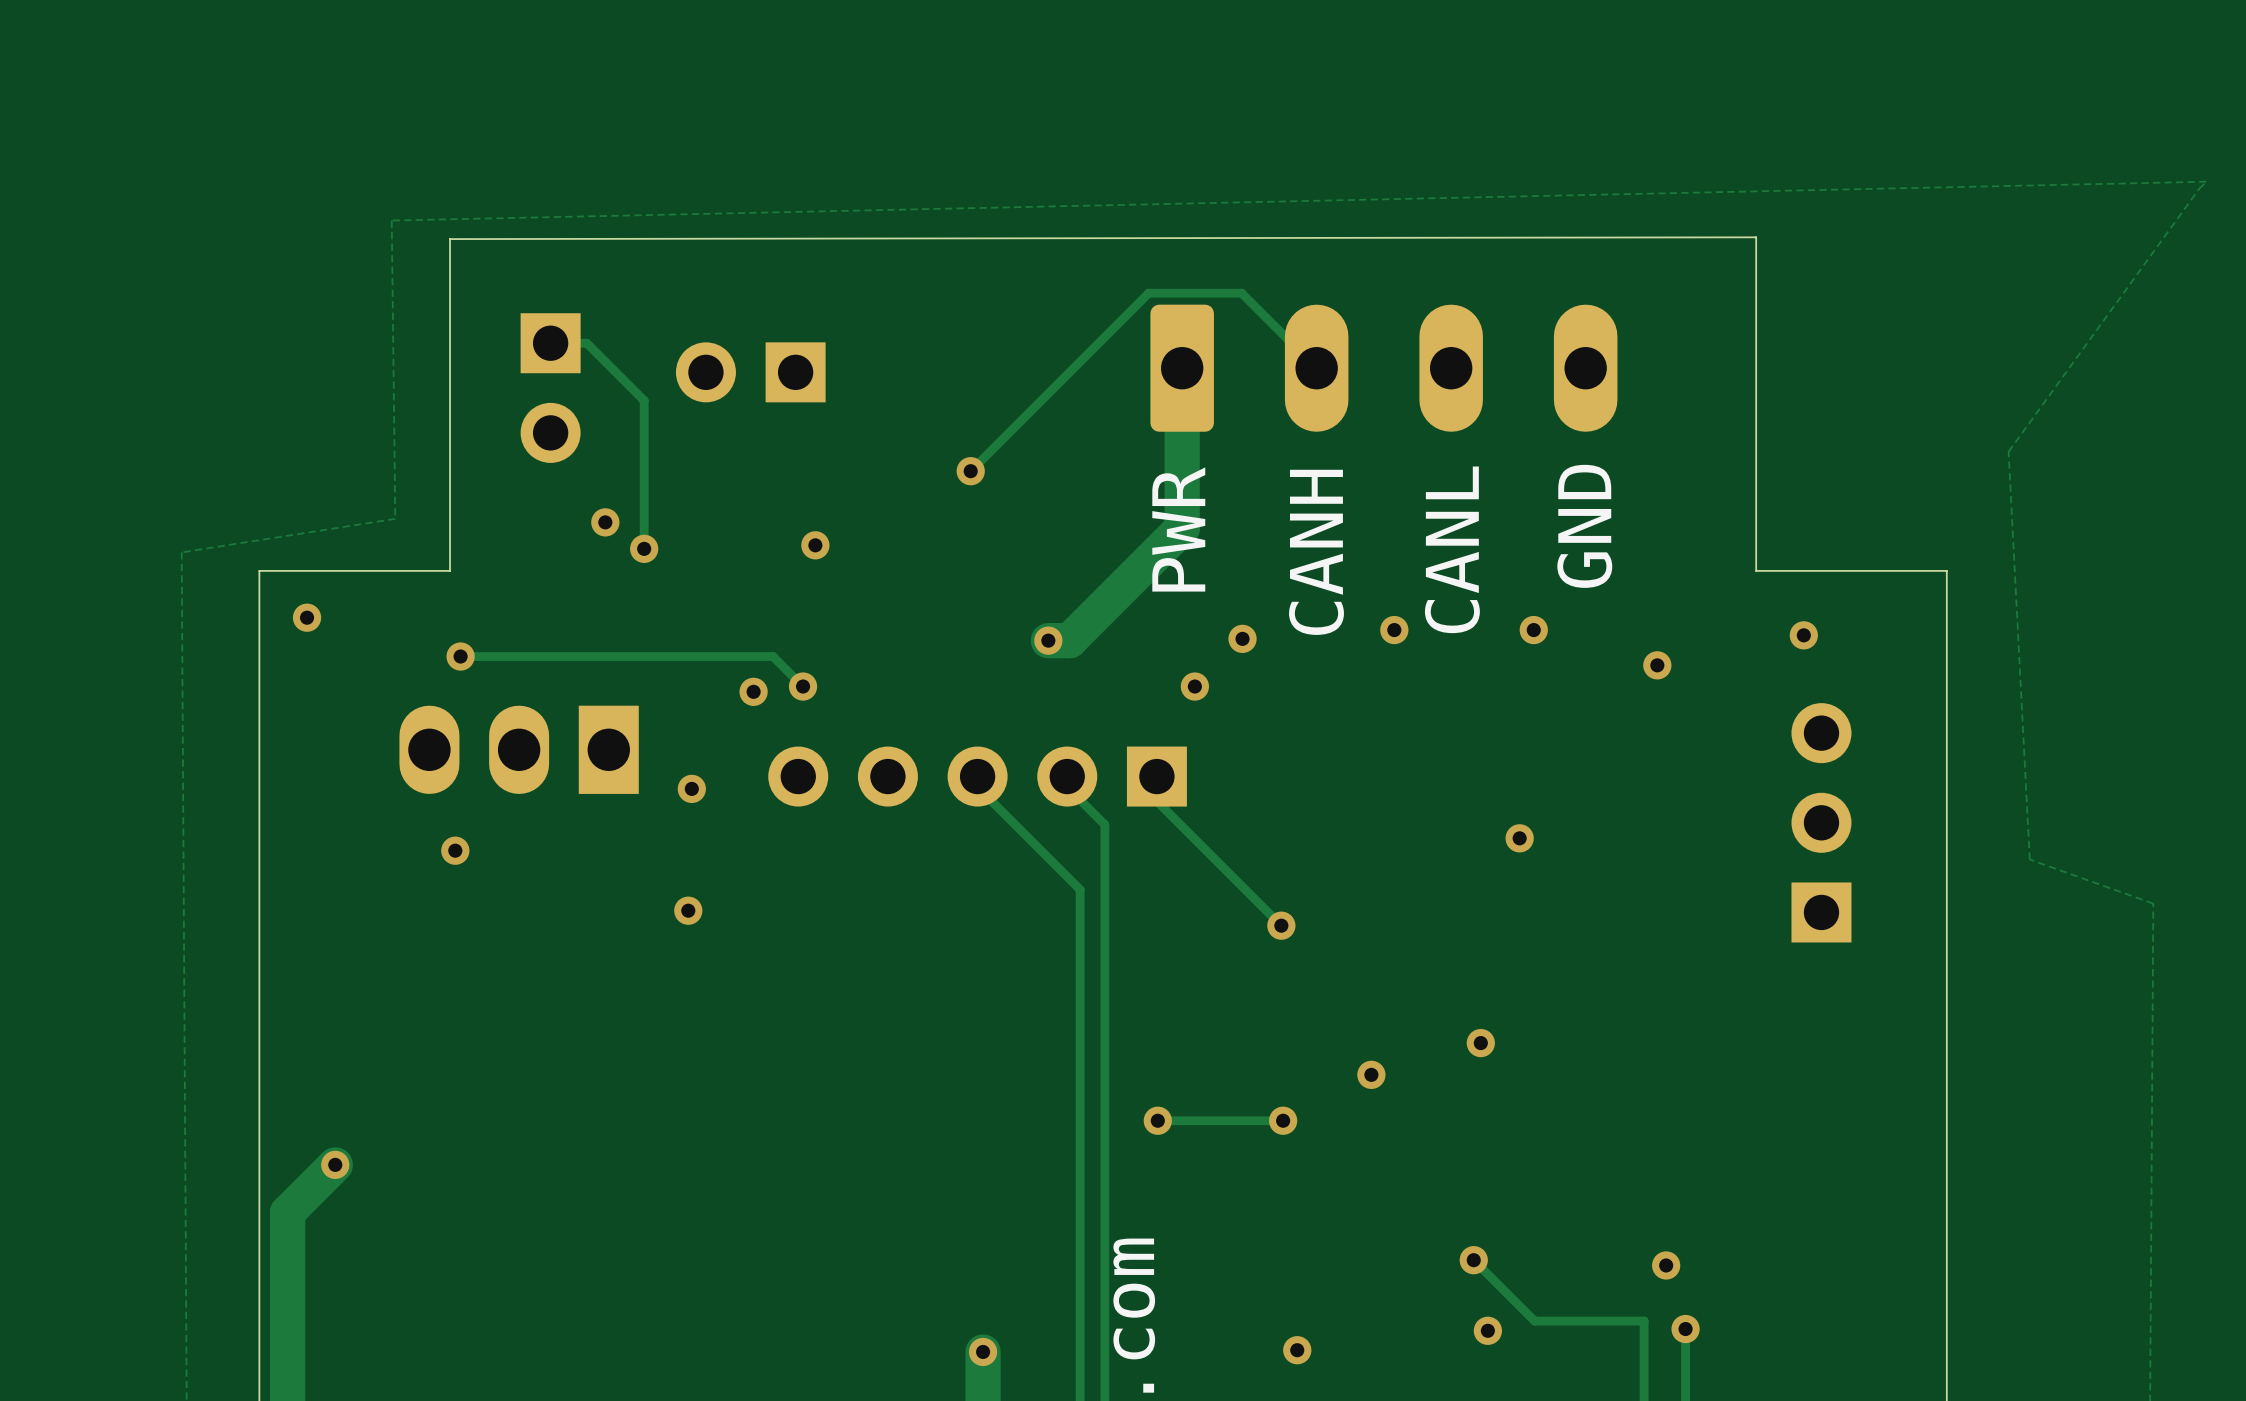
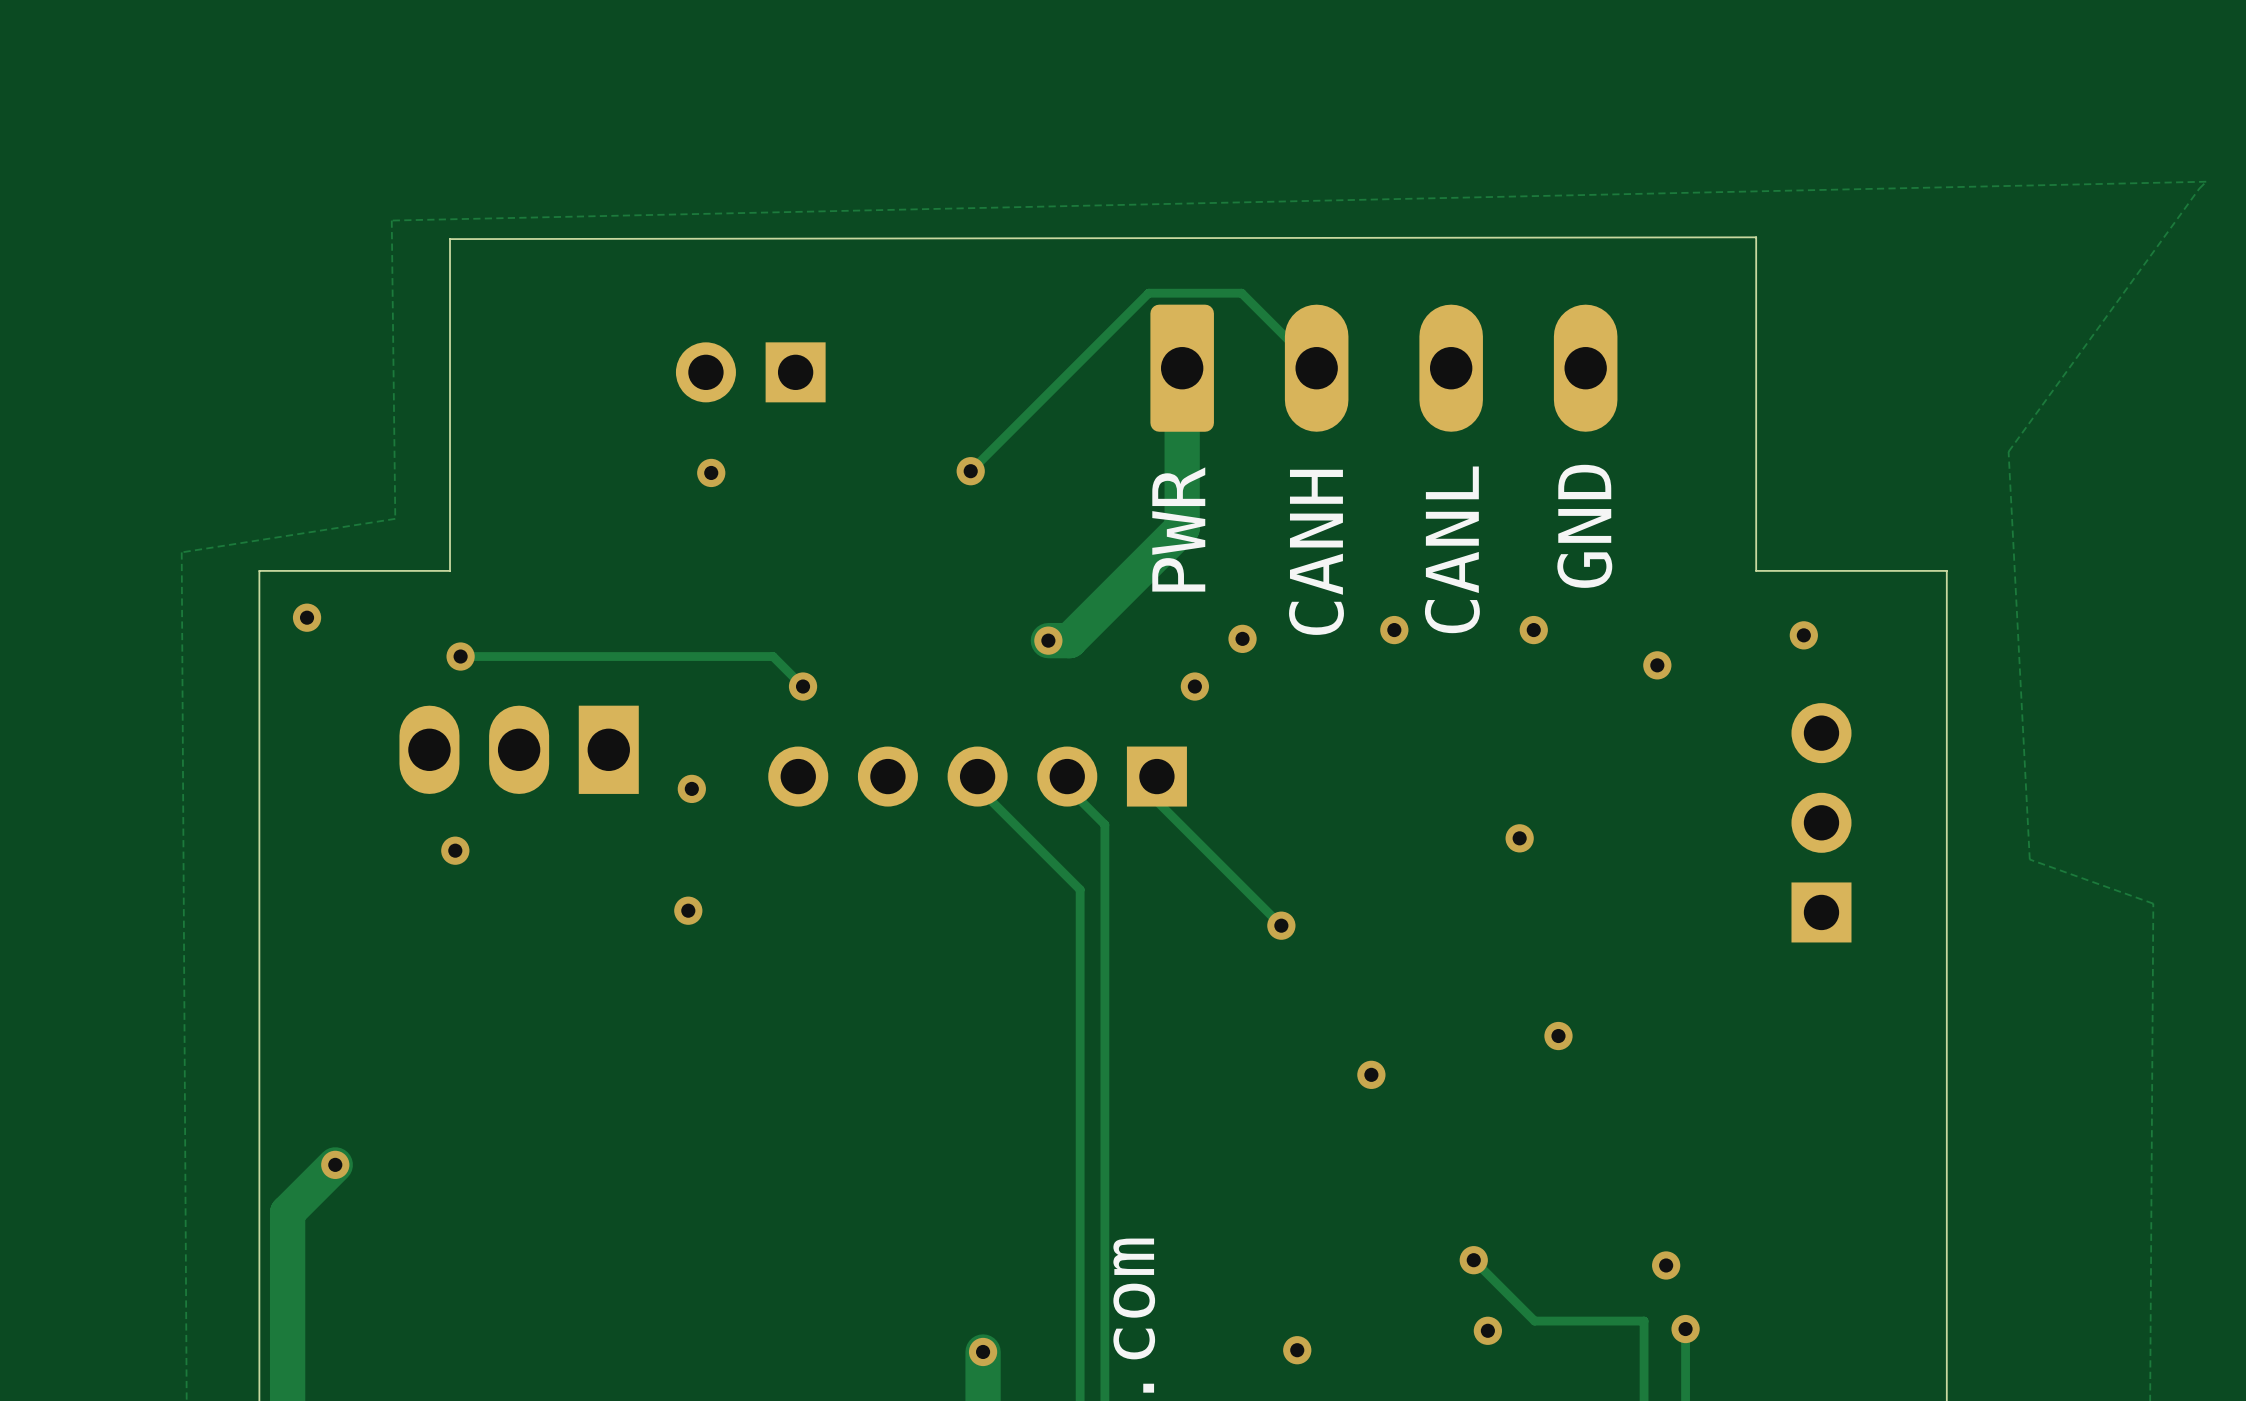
track: (550, 343) (586, 343) (644, 400) (644, 548) -> none
part: (550, 388) -> none
via: none -> (711, 472)
via: (605, 522) -> none
via: (815, 545) -> none
via: (644, 548) -> none
via: (753, 691) -> none
via position: (1480, 1043) -> (1558, 1036)
via: (1157, 1120) -> none
track: (1283, 1120) (1157, 1120) -> none
via: (1283, 1120) -> none

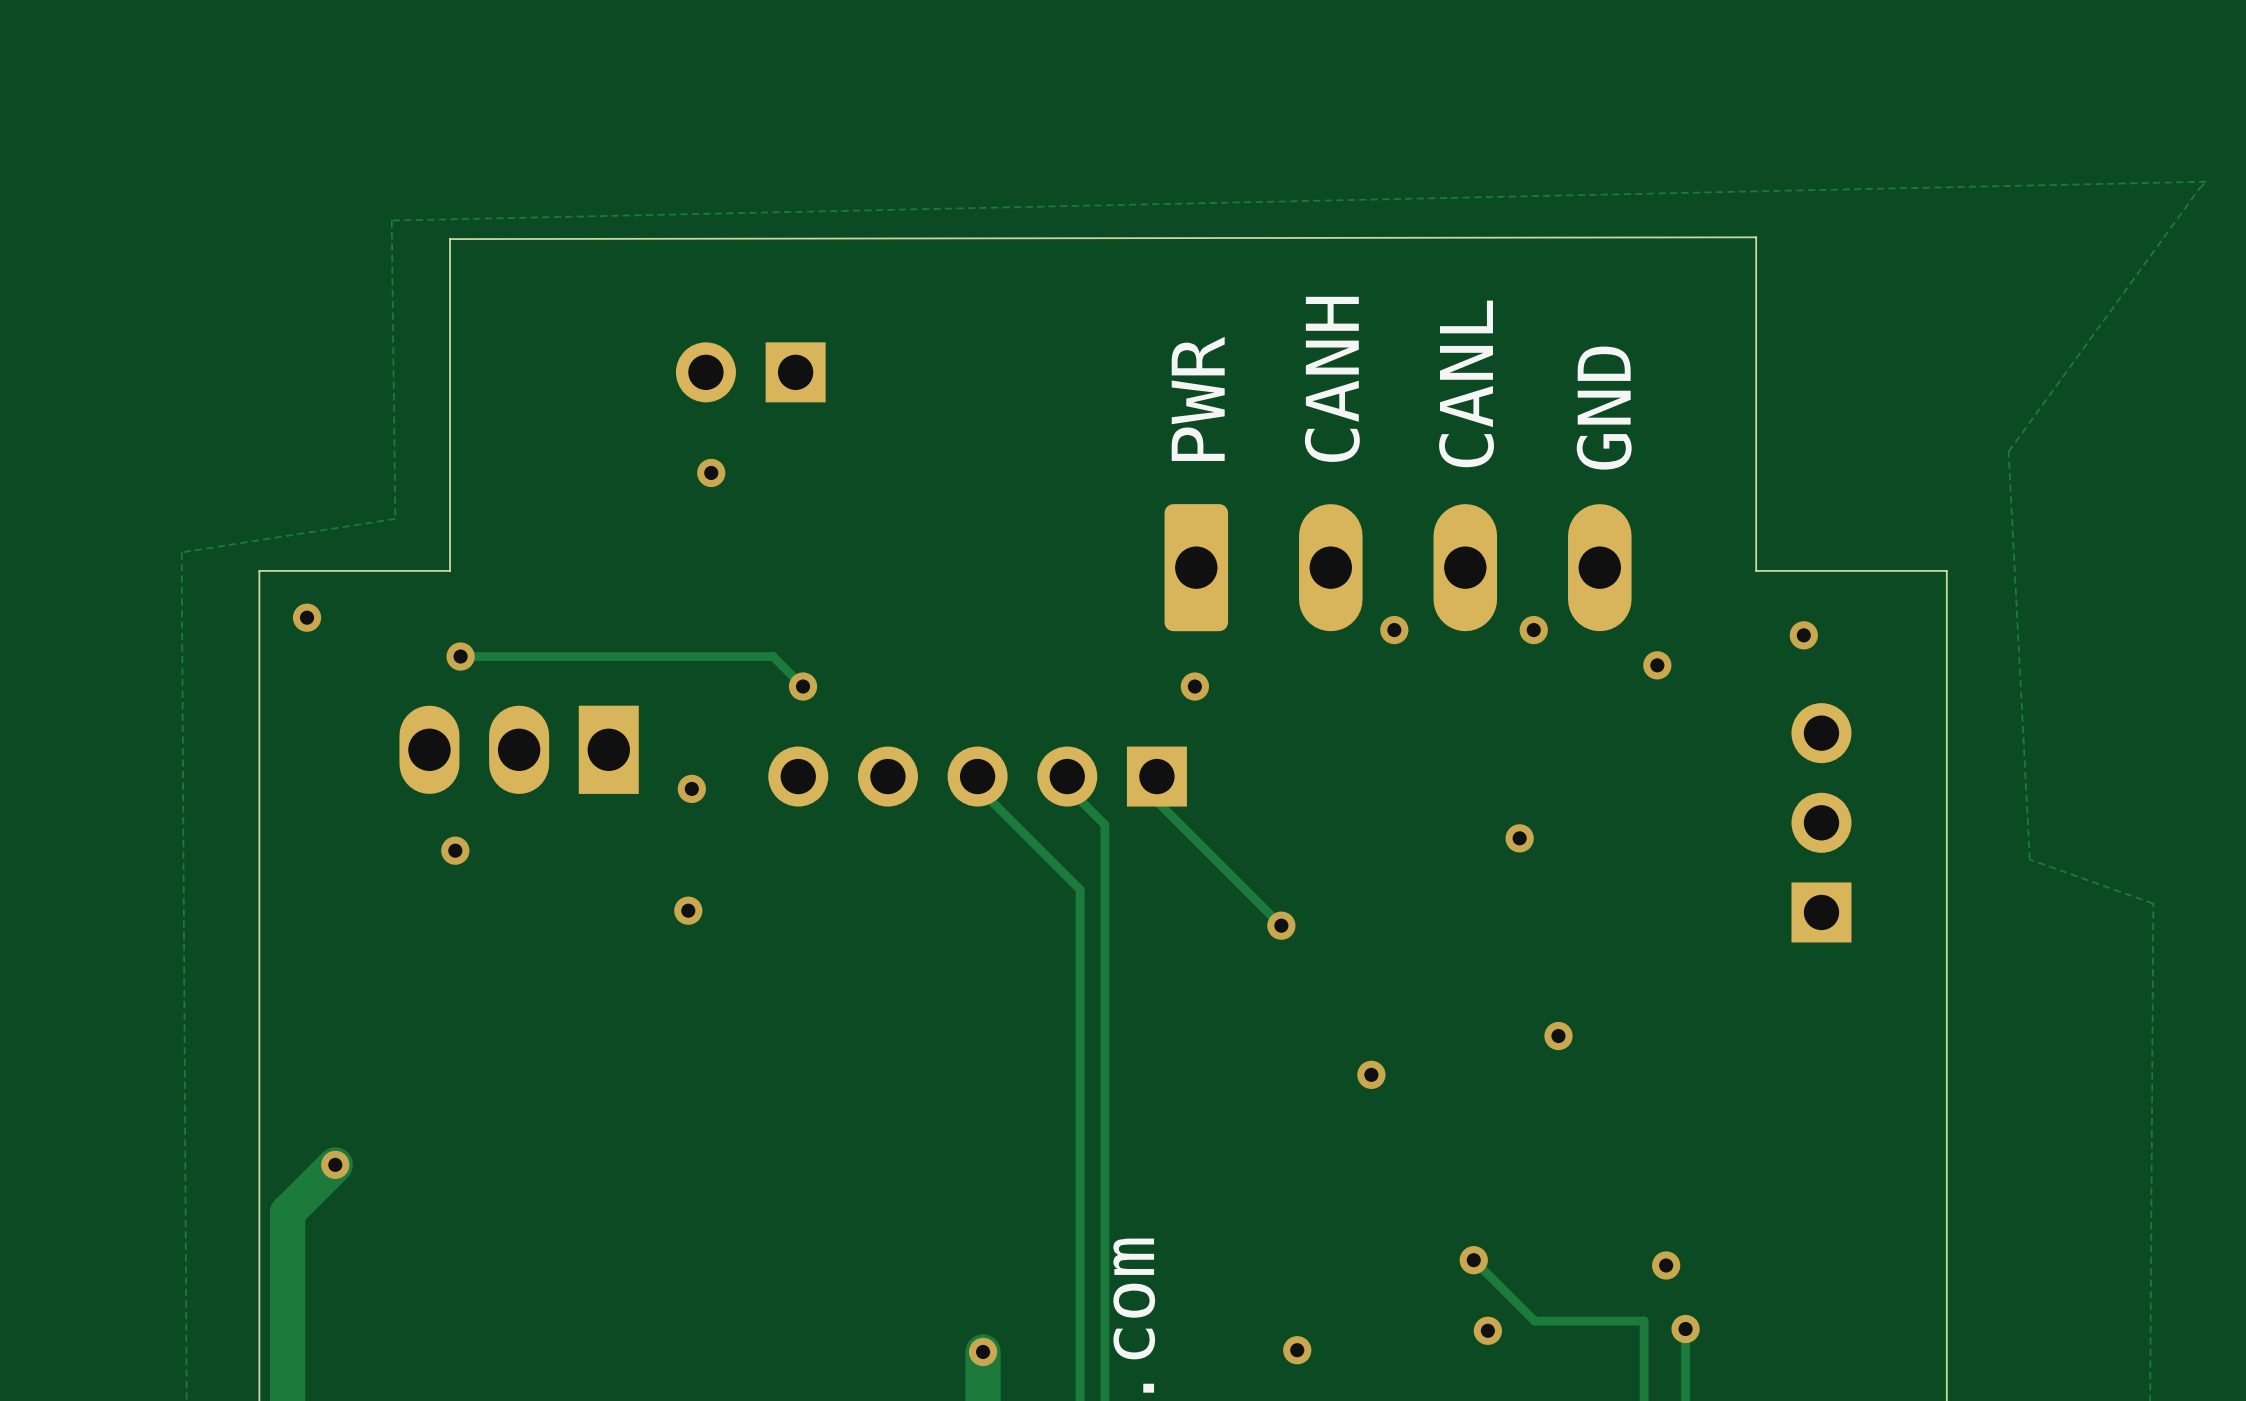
track: (1182, 368) (1182, 528) (1069, 640) (1048, 640) -> none
track: (1316, 368) (1241, 293) (1148, 293) (970, 471) -> none
part: (1383, 368) -> none
via: (970, 471) -> none
text position: GND (1584, 526) -> GND (1604, 408)
text position: PWR (1178, 529) -> PWR (1198, 398)
text position: CANL (1452, 549) -> CANL (1466, 383)
text position: CANH (1316, 552) -> CANH (1332, 379)
part: none -> (1398, 567)
via: (1242, 638) -> none
via: (1048, 640) -> none

